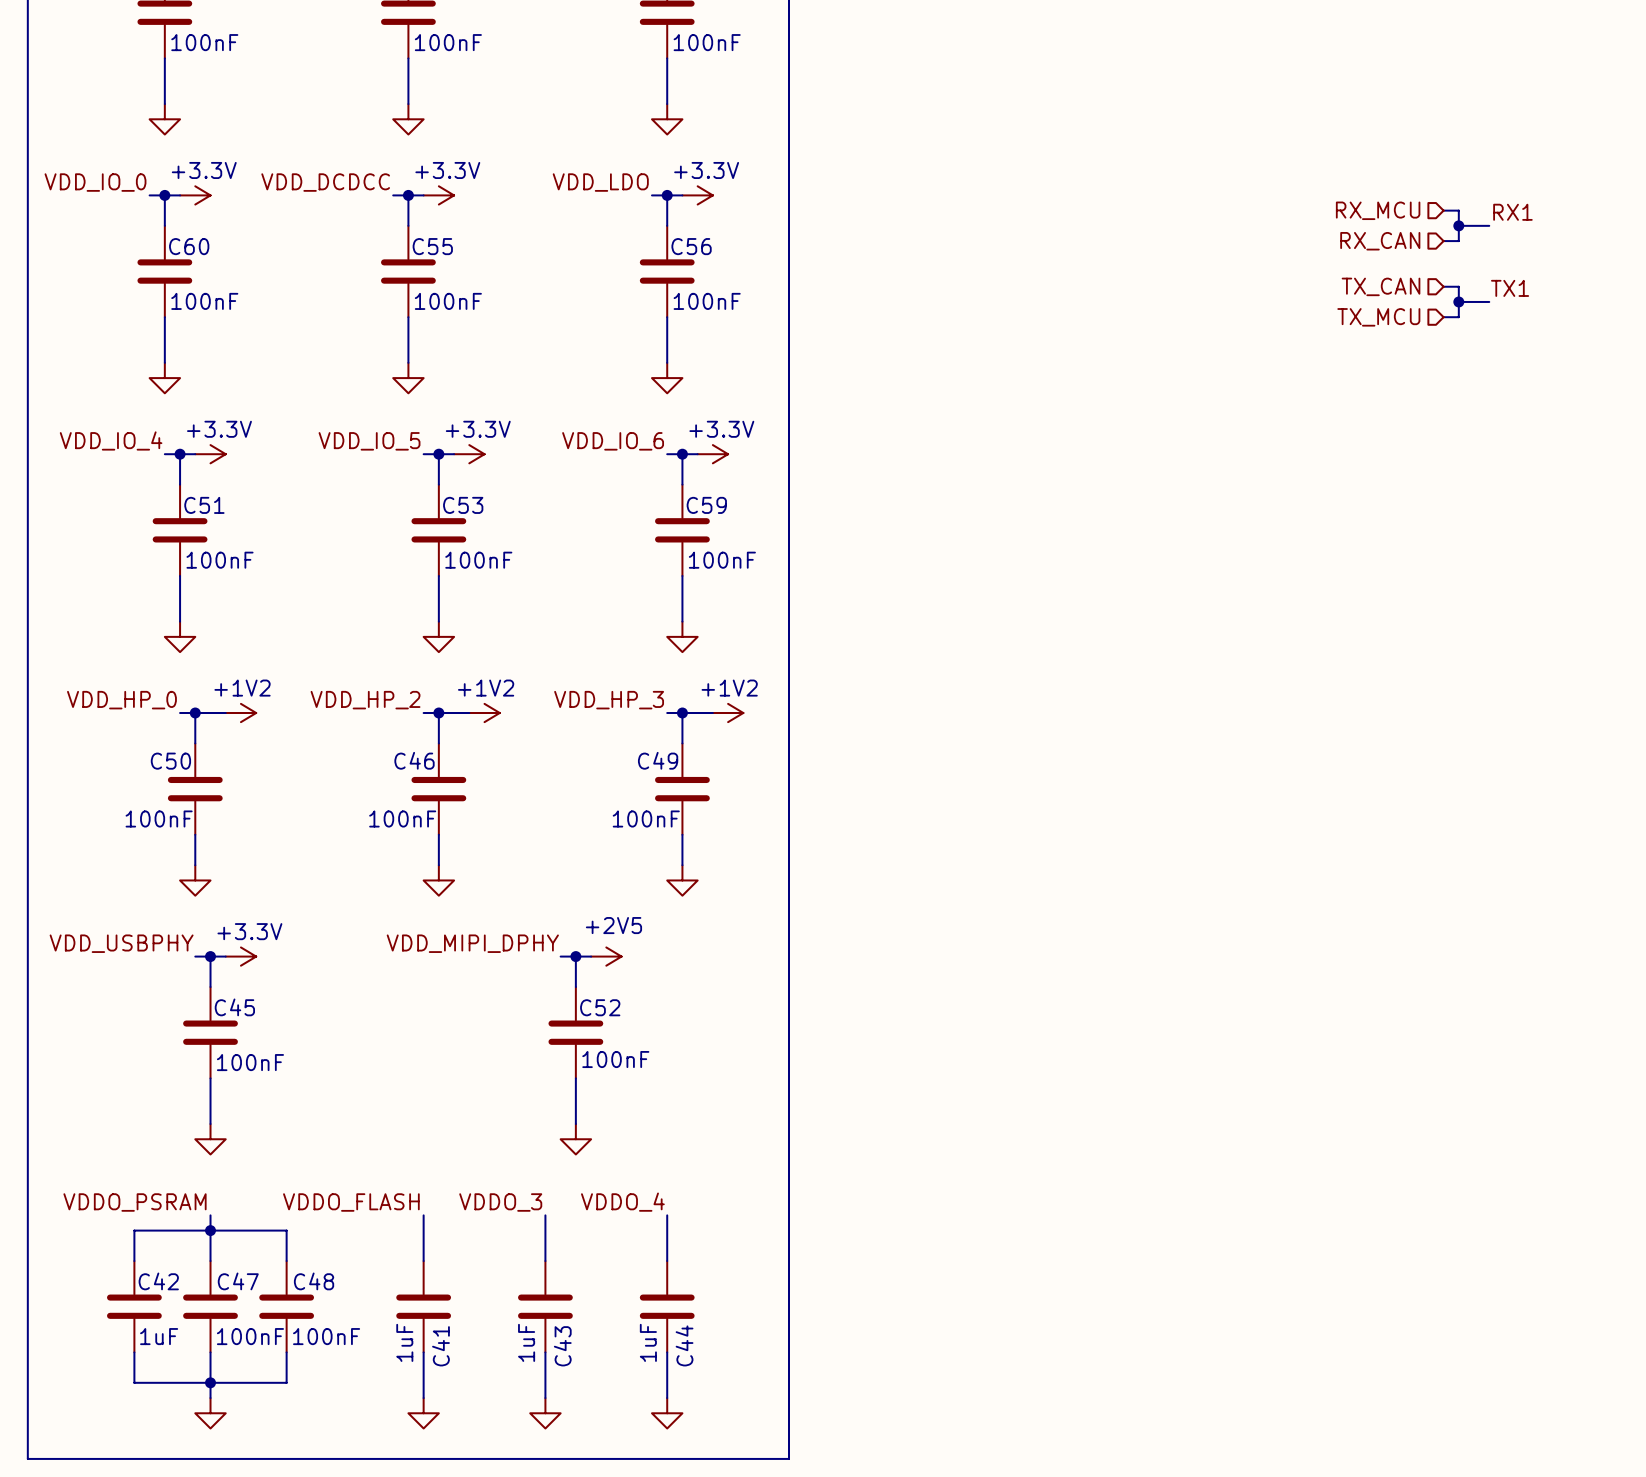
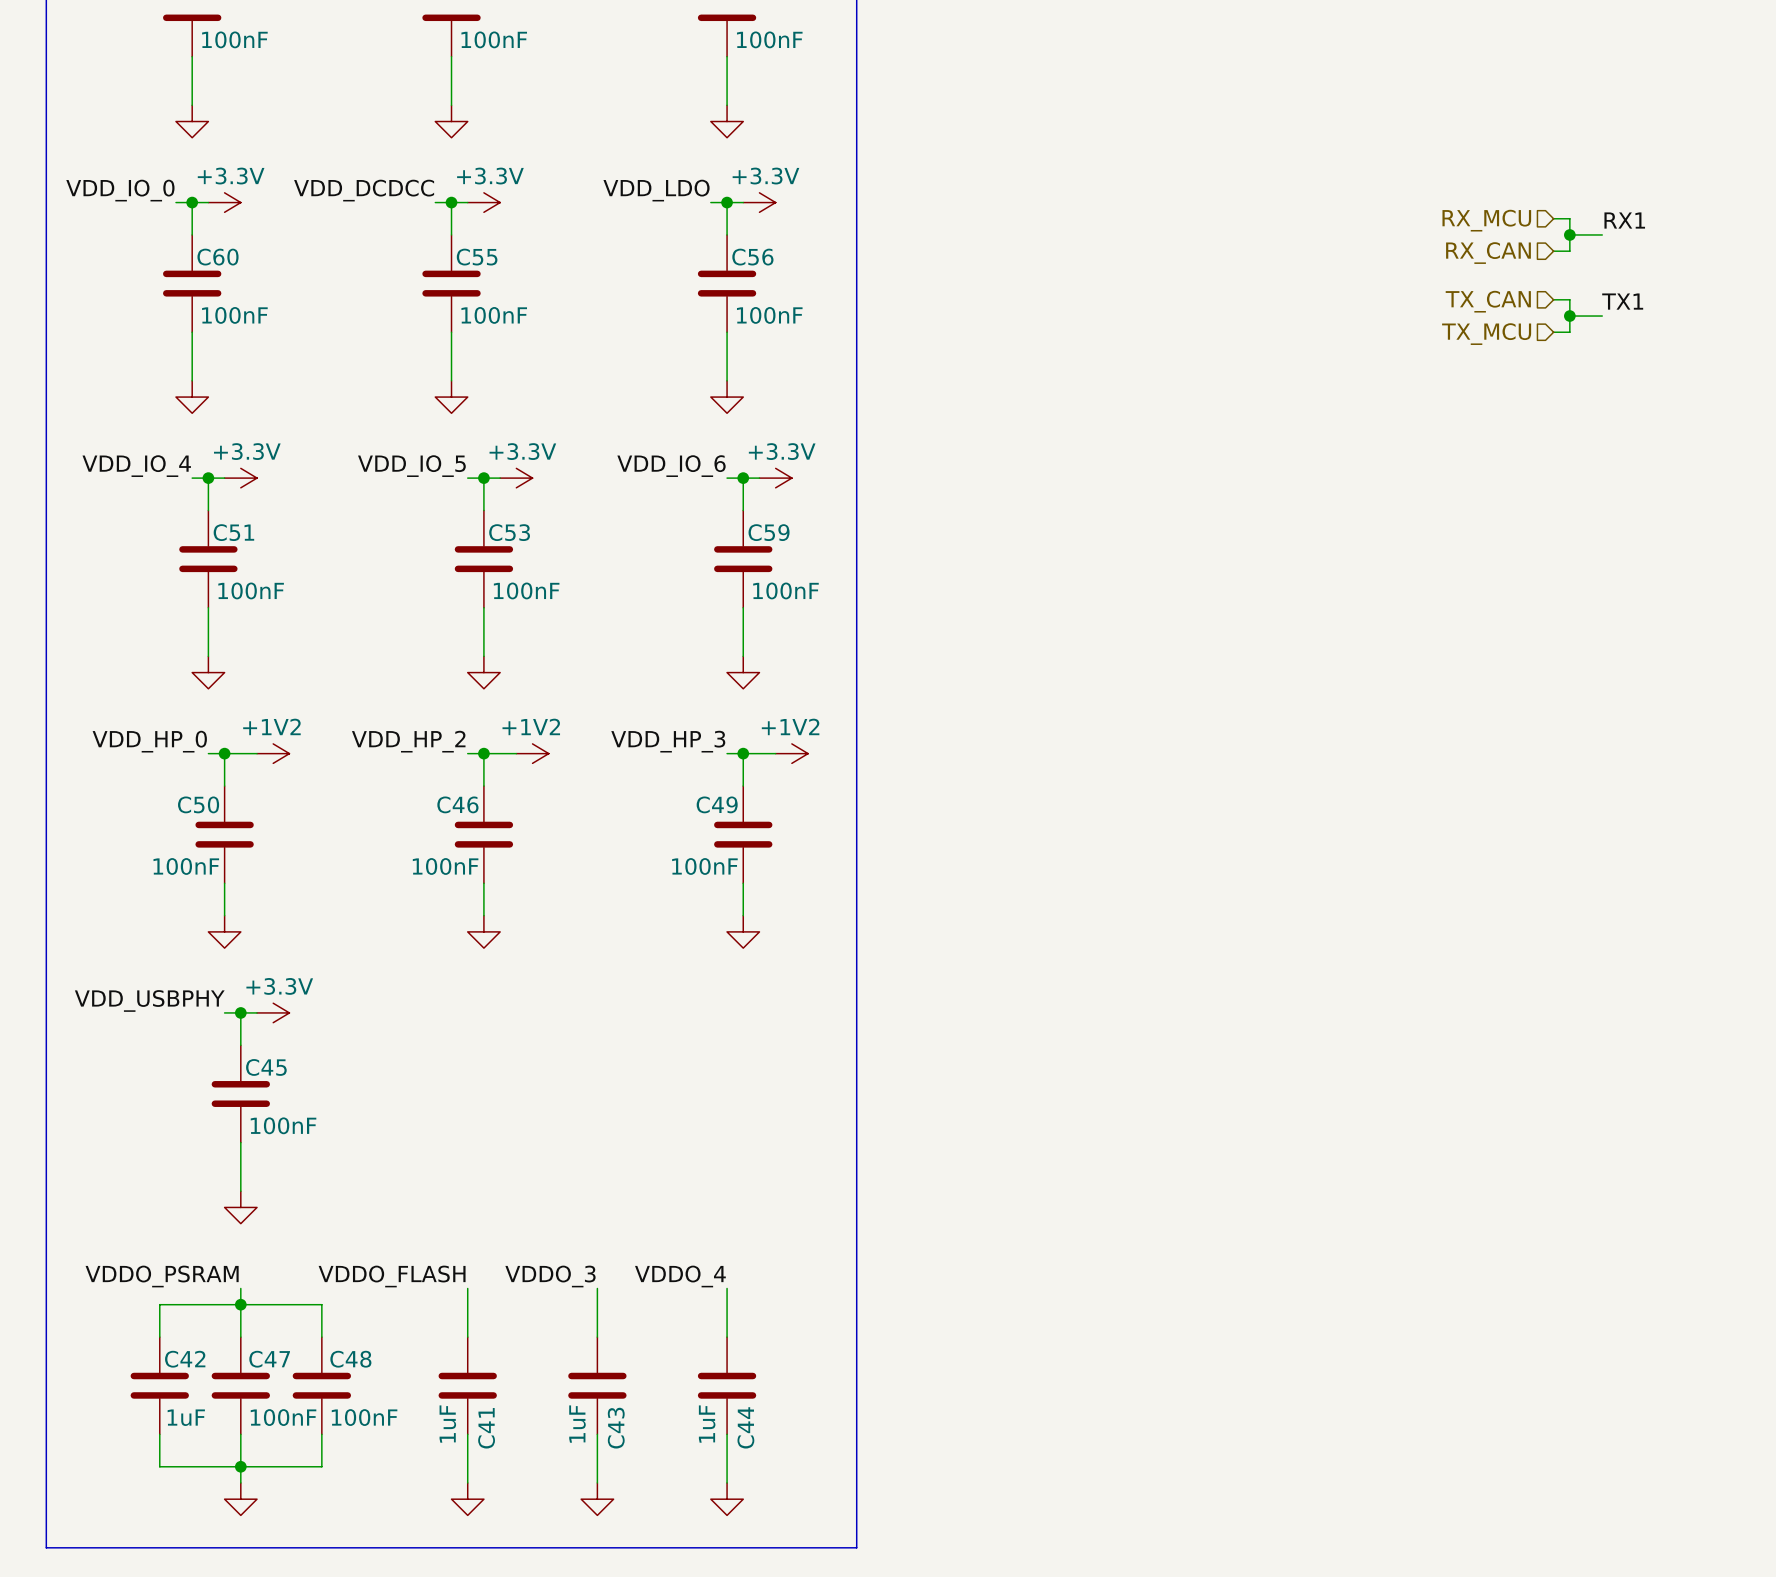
label: VDD_MIPI_DPHY (472, 943) -> none
wire: (560, 956) (591, 956) -> none
wire: (575, 956) (575, 987) -> none
junction: (575, 956) -> none
power symbol: +2V5 (606, 956) -> none
C52: 100nF (575, 1032) -> none
wire: (575, 1078) (575, 1124) -> none
power symbol: (575, 1139) -> none

